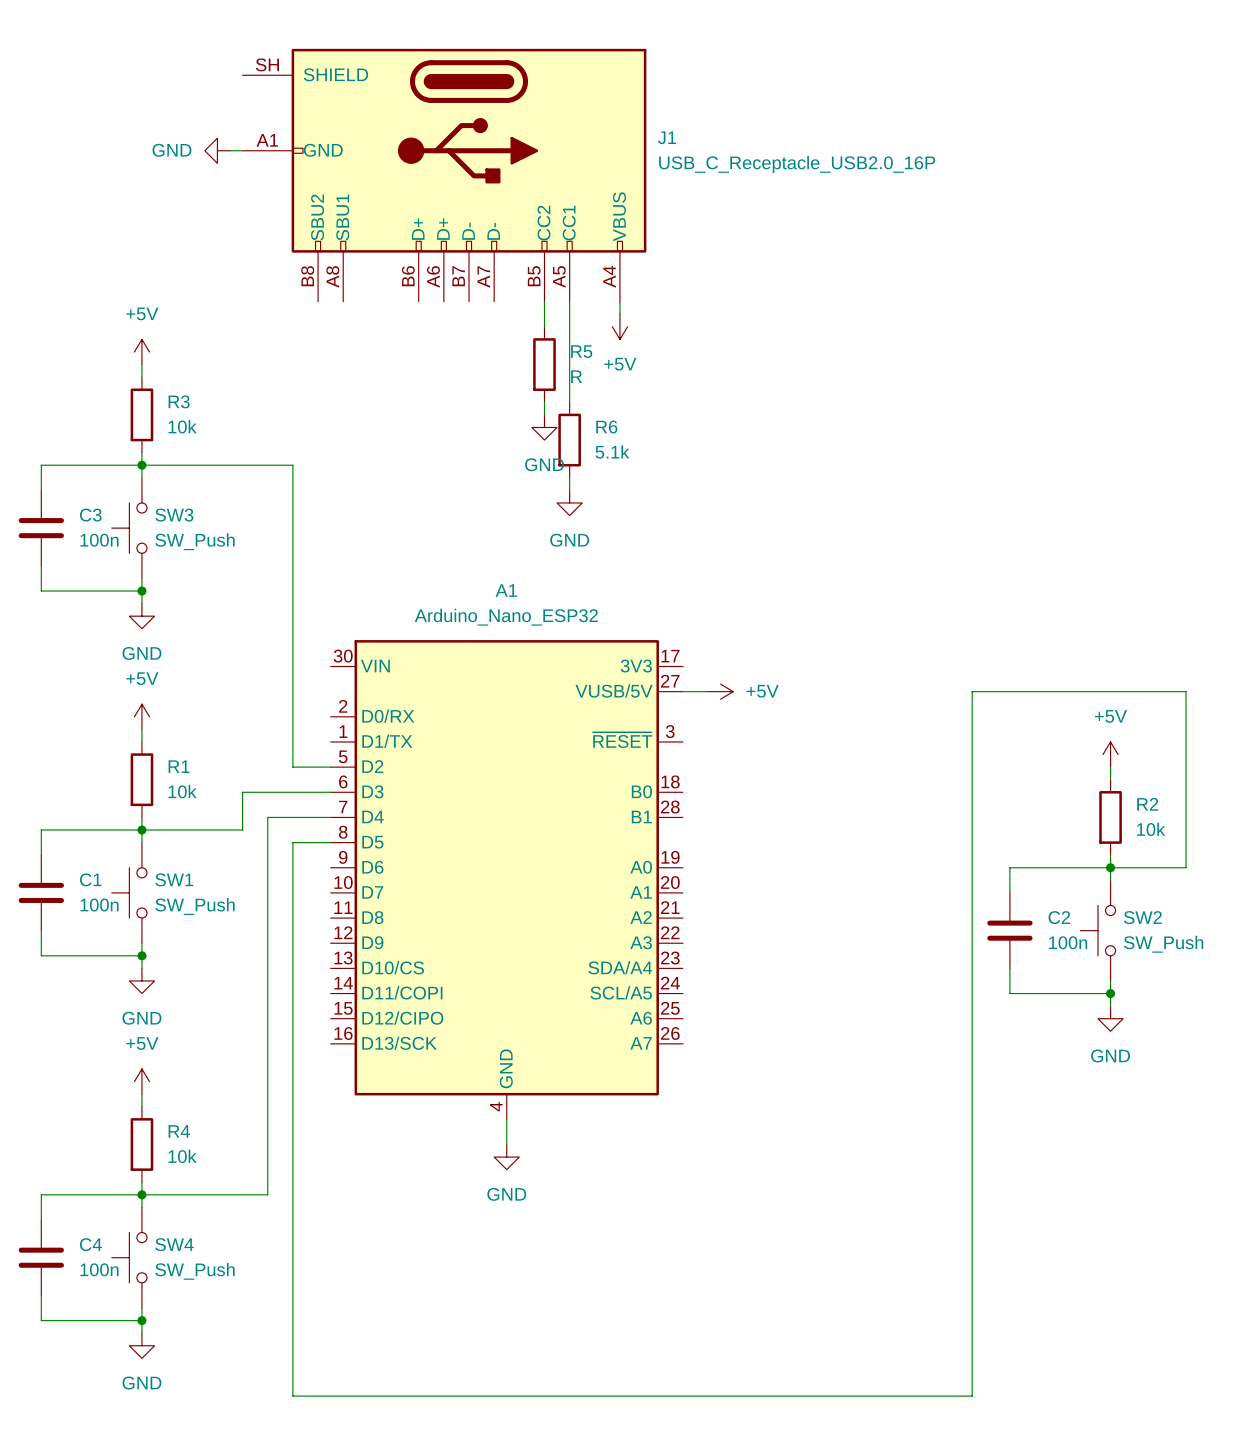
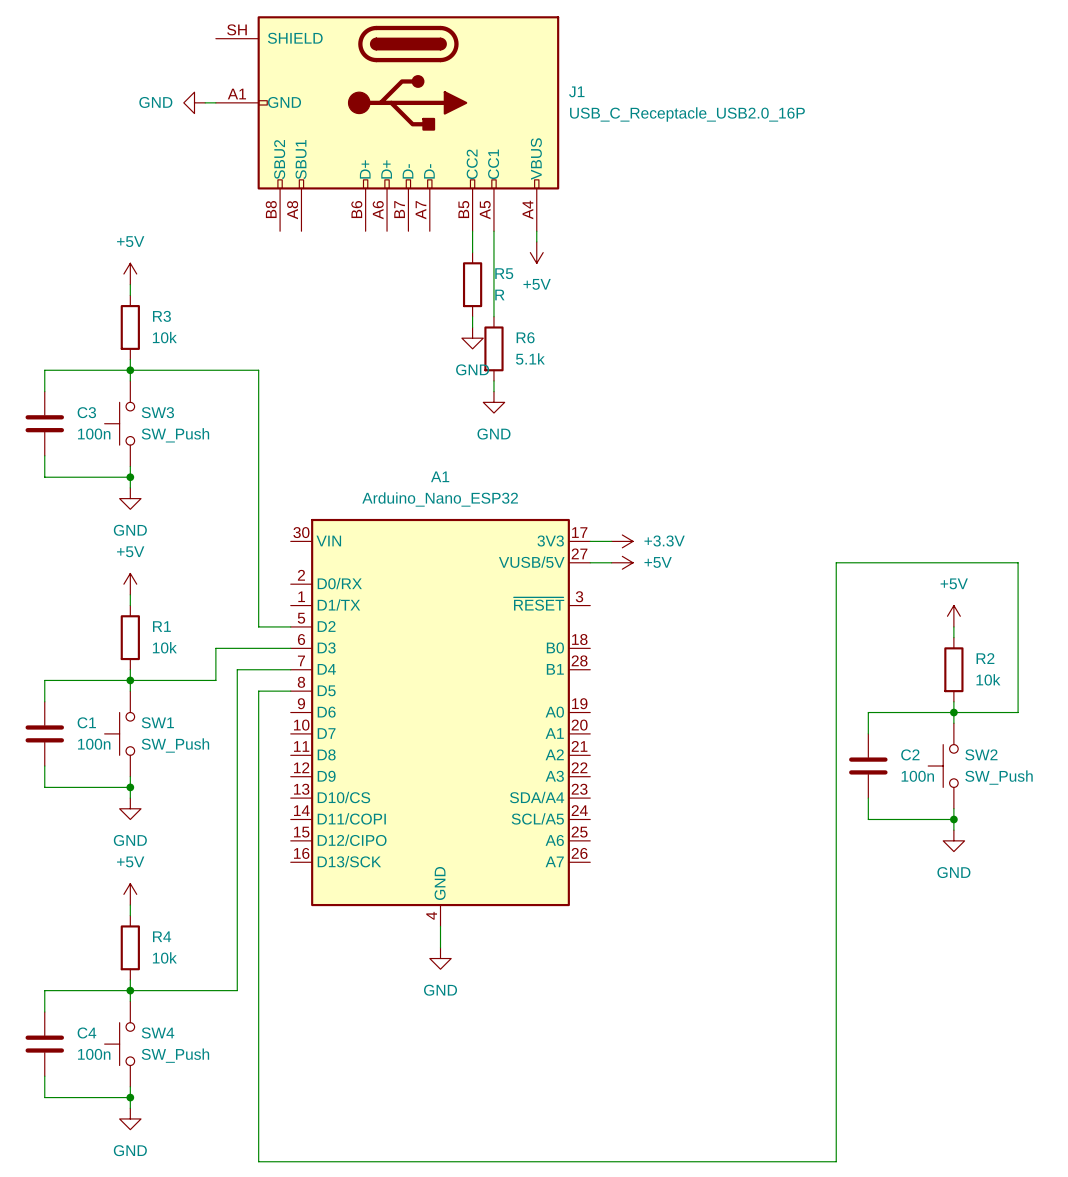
wire: none -> (590, 541) (611, 541)
power symbol: none -> +3.3V (622, 541)

